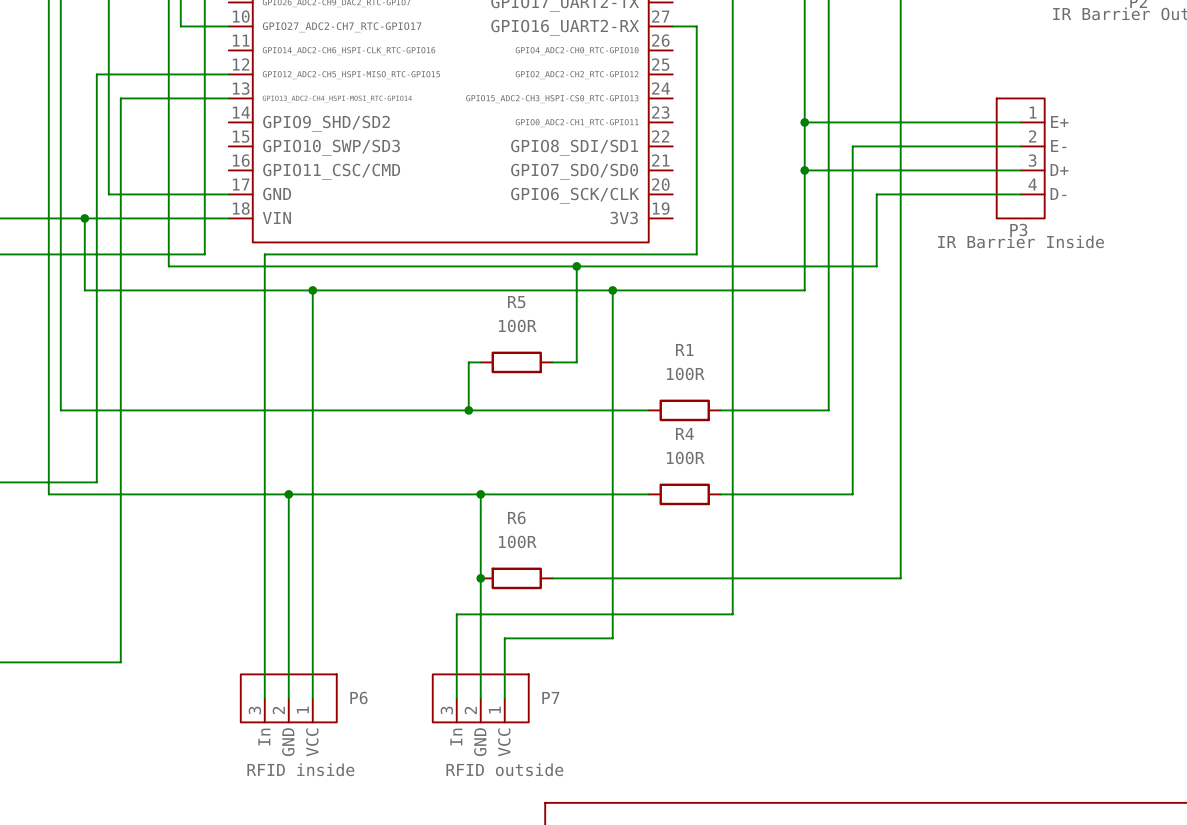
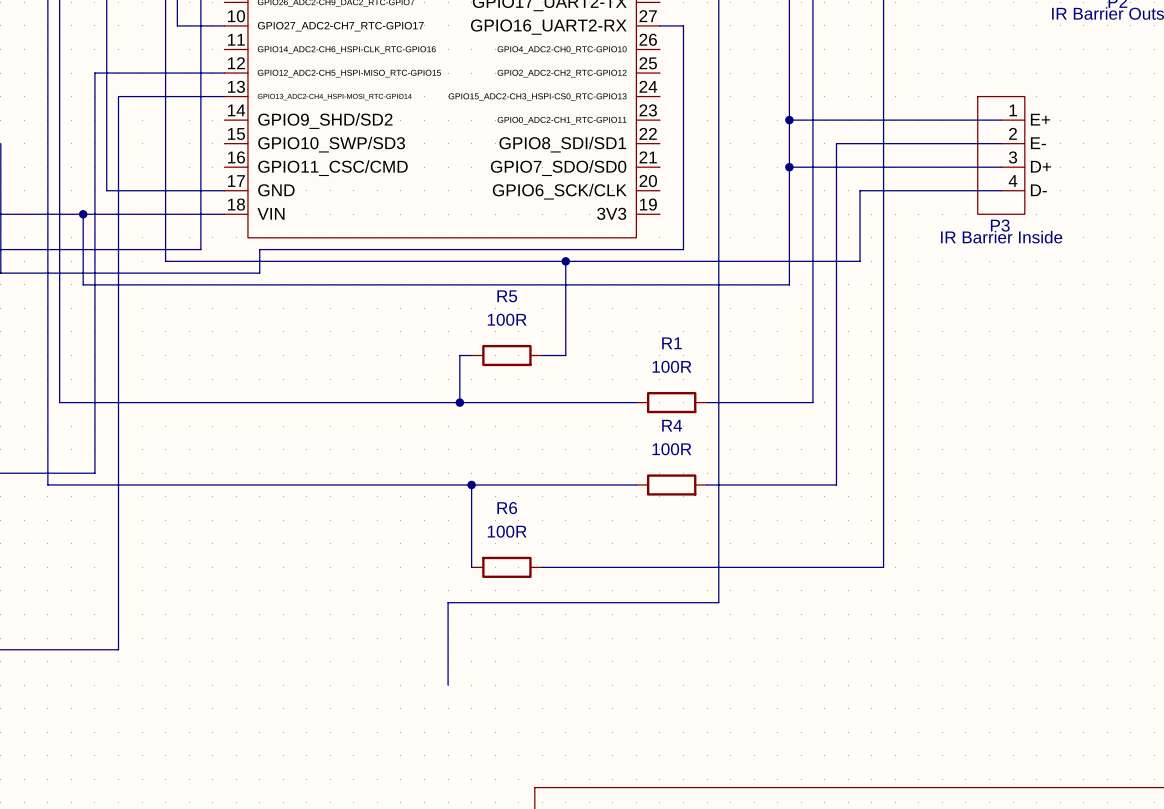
wire: (264, 278) (264, 698) -> (259, 273) (0, 273) (0, 143)
wire: (312, 290) (312, 698) -> none
junction: (312, 290) -> none
wire: (612, 290) (612, 638) (504, 638) (504, 698) -> none
junction: (612, 290) -> none
wire: (288, 494) (288, 698) -> none
junction: (288, 494) -> none
wire: (480, 578) (480, 698) -> none
junction: (480, 578) -> none
P6: RFID inside (288, 698) -> none
P7: RFID outside (480, 698) -> none

